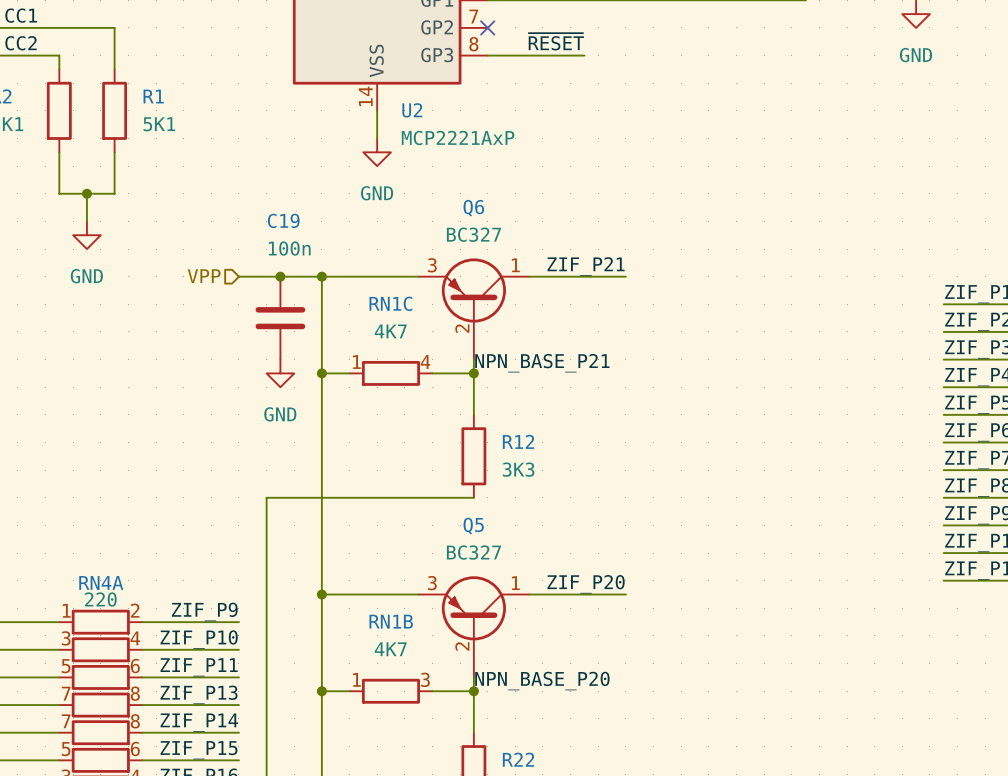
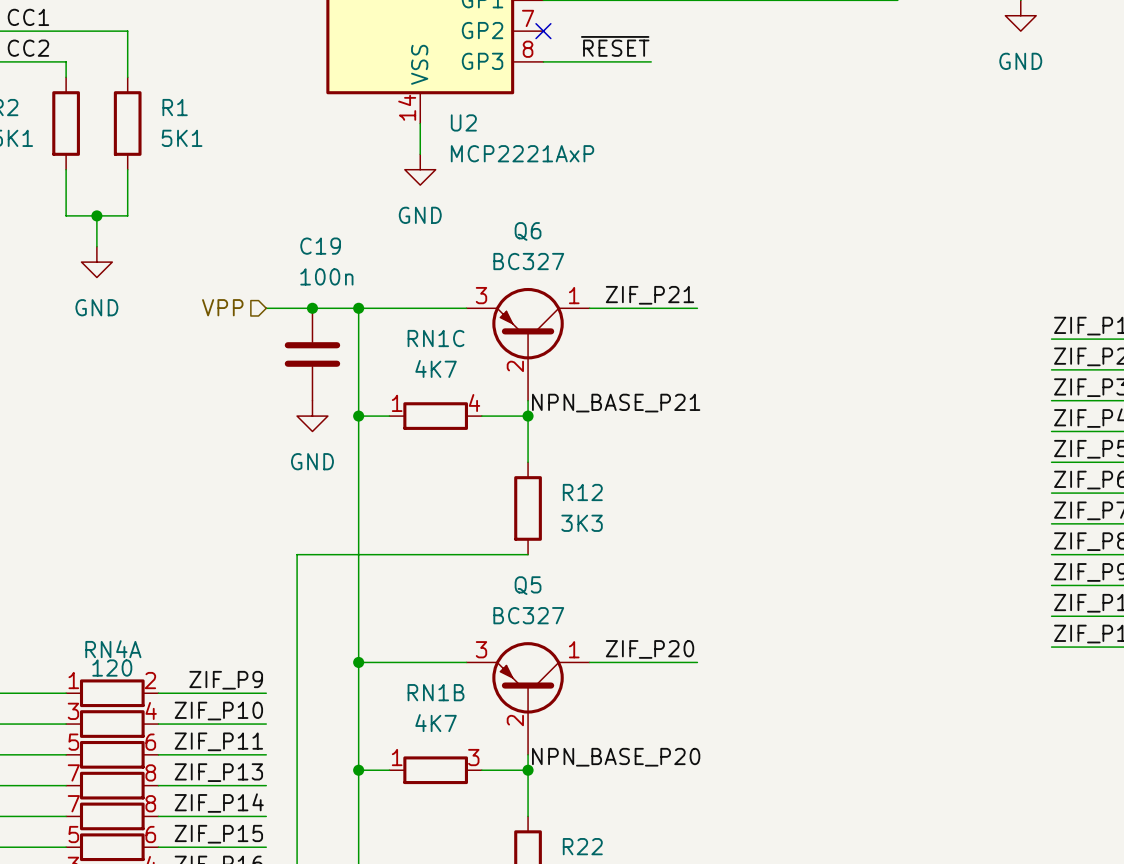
RN4A value: 220 (100, 599) -> 120 (112, 668)

